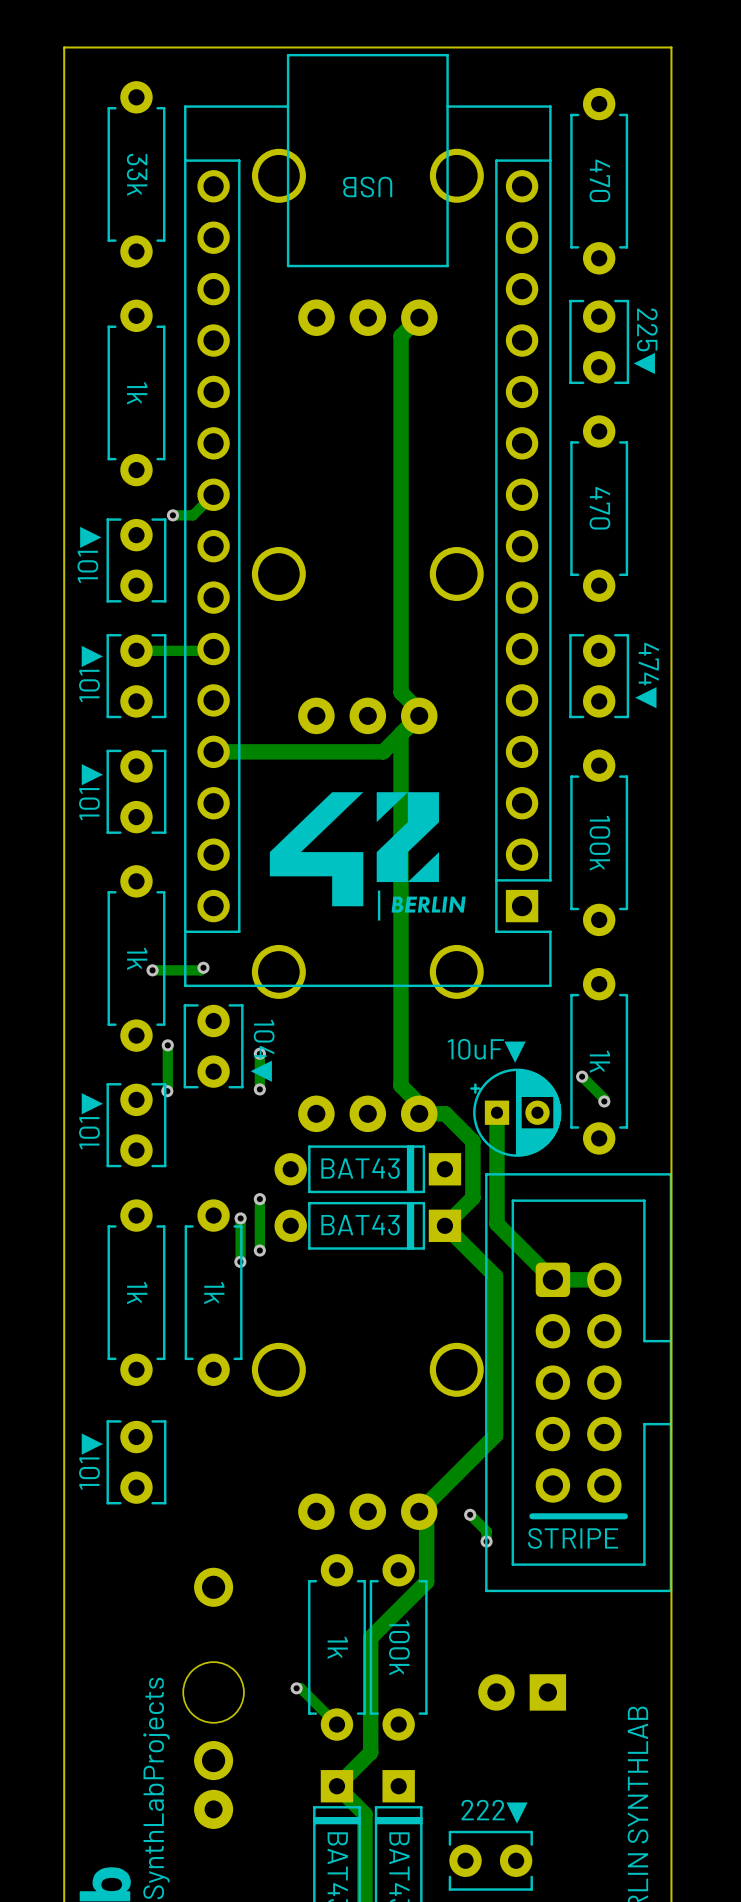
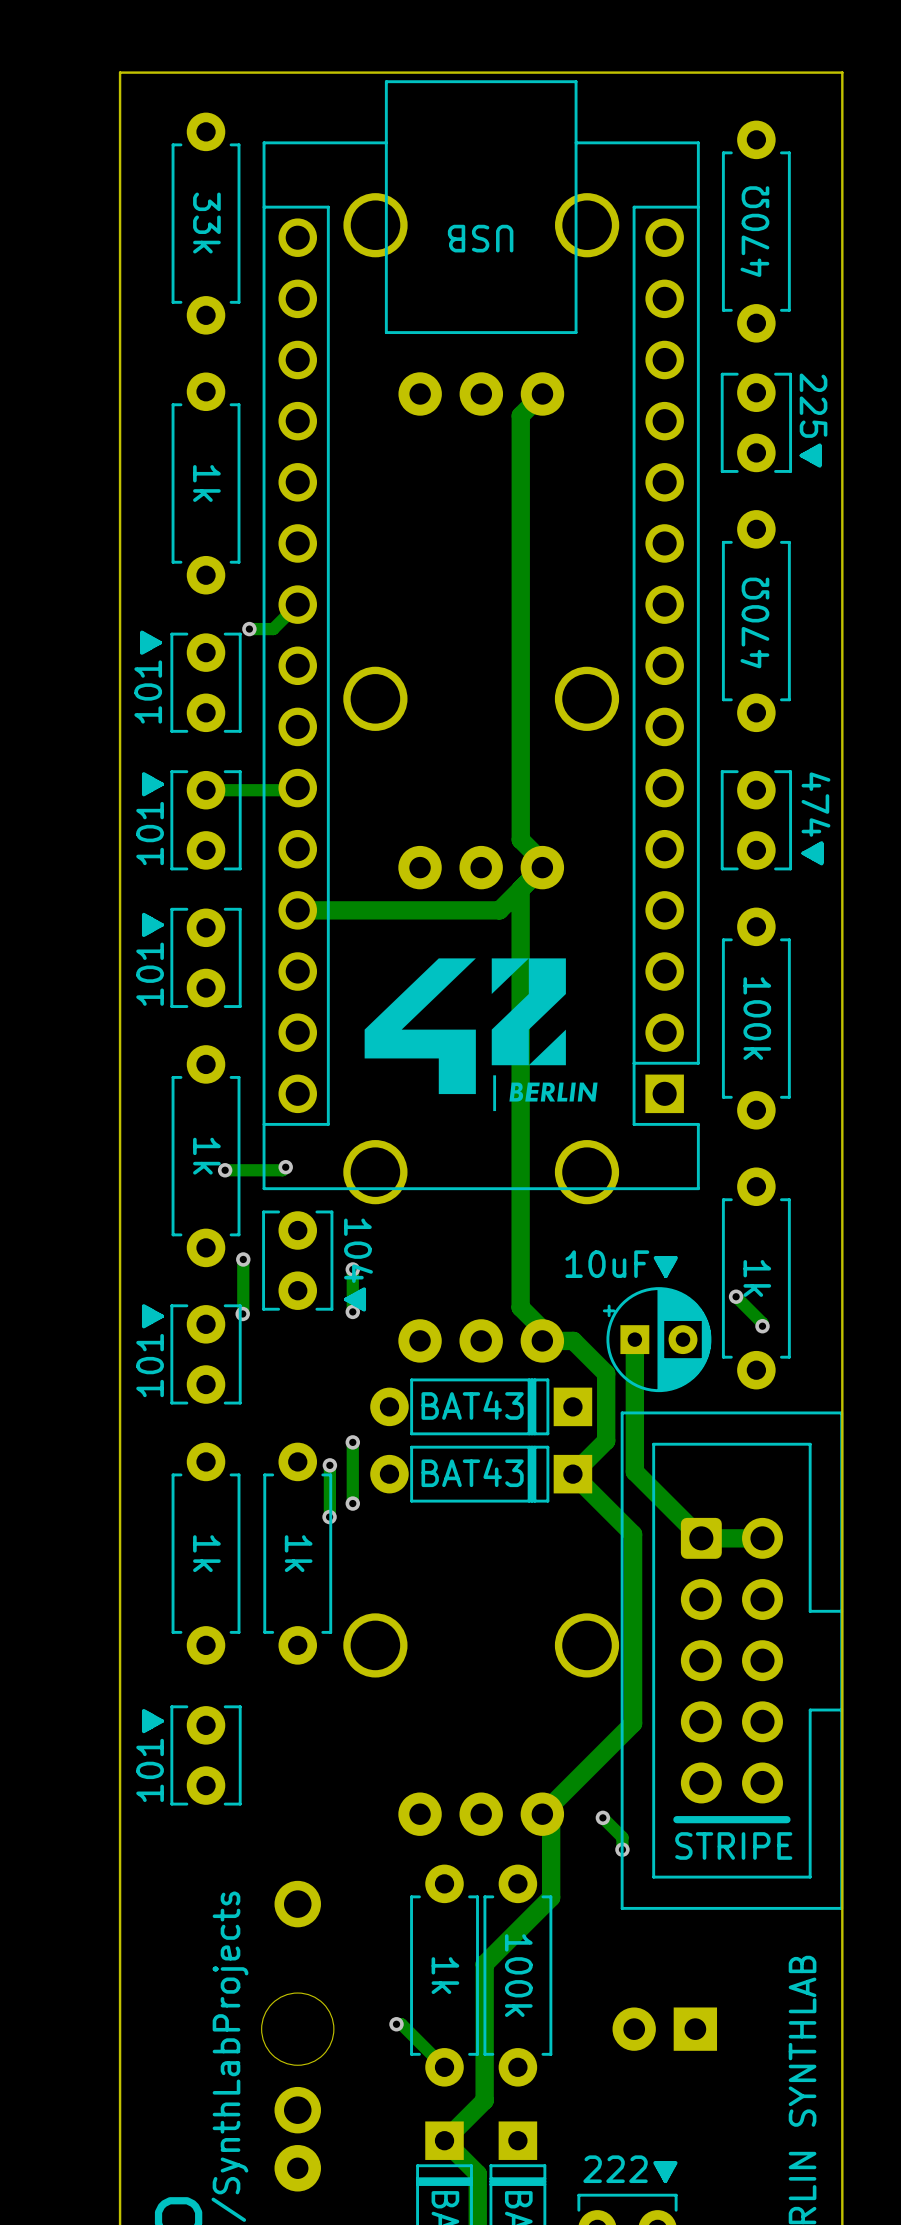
part value: 470 (599, 180) -> none
part text: none -> 470Ω (754, 231)
part value: 470 (599, 508) -> none
part text: none -> 470Ω (754, 622)

